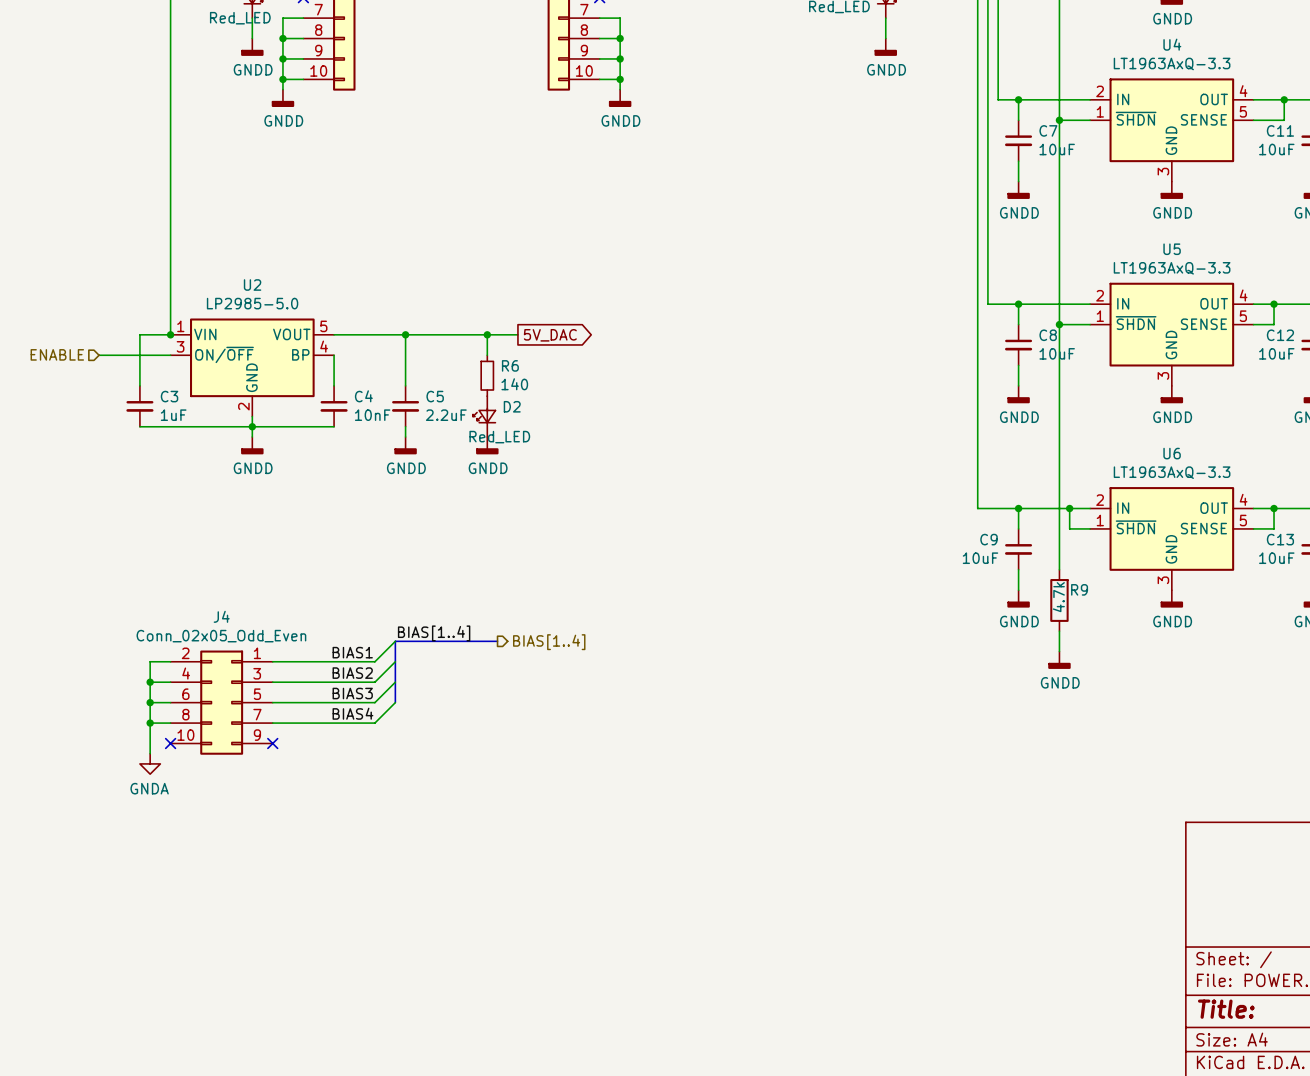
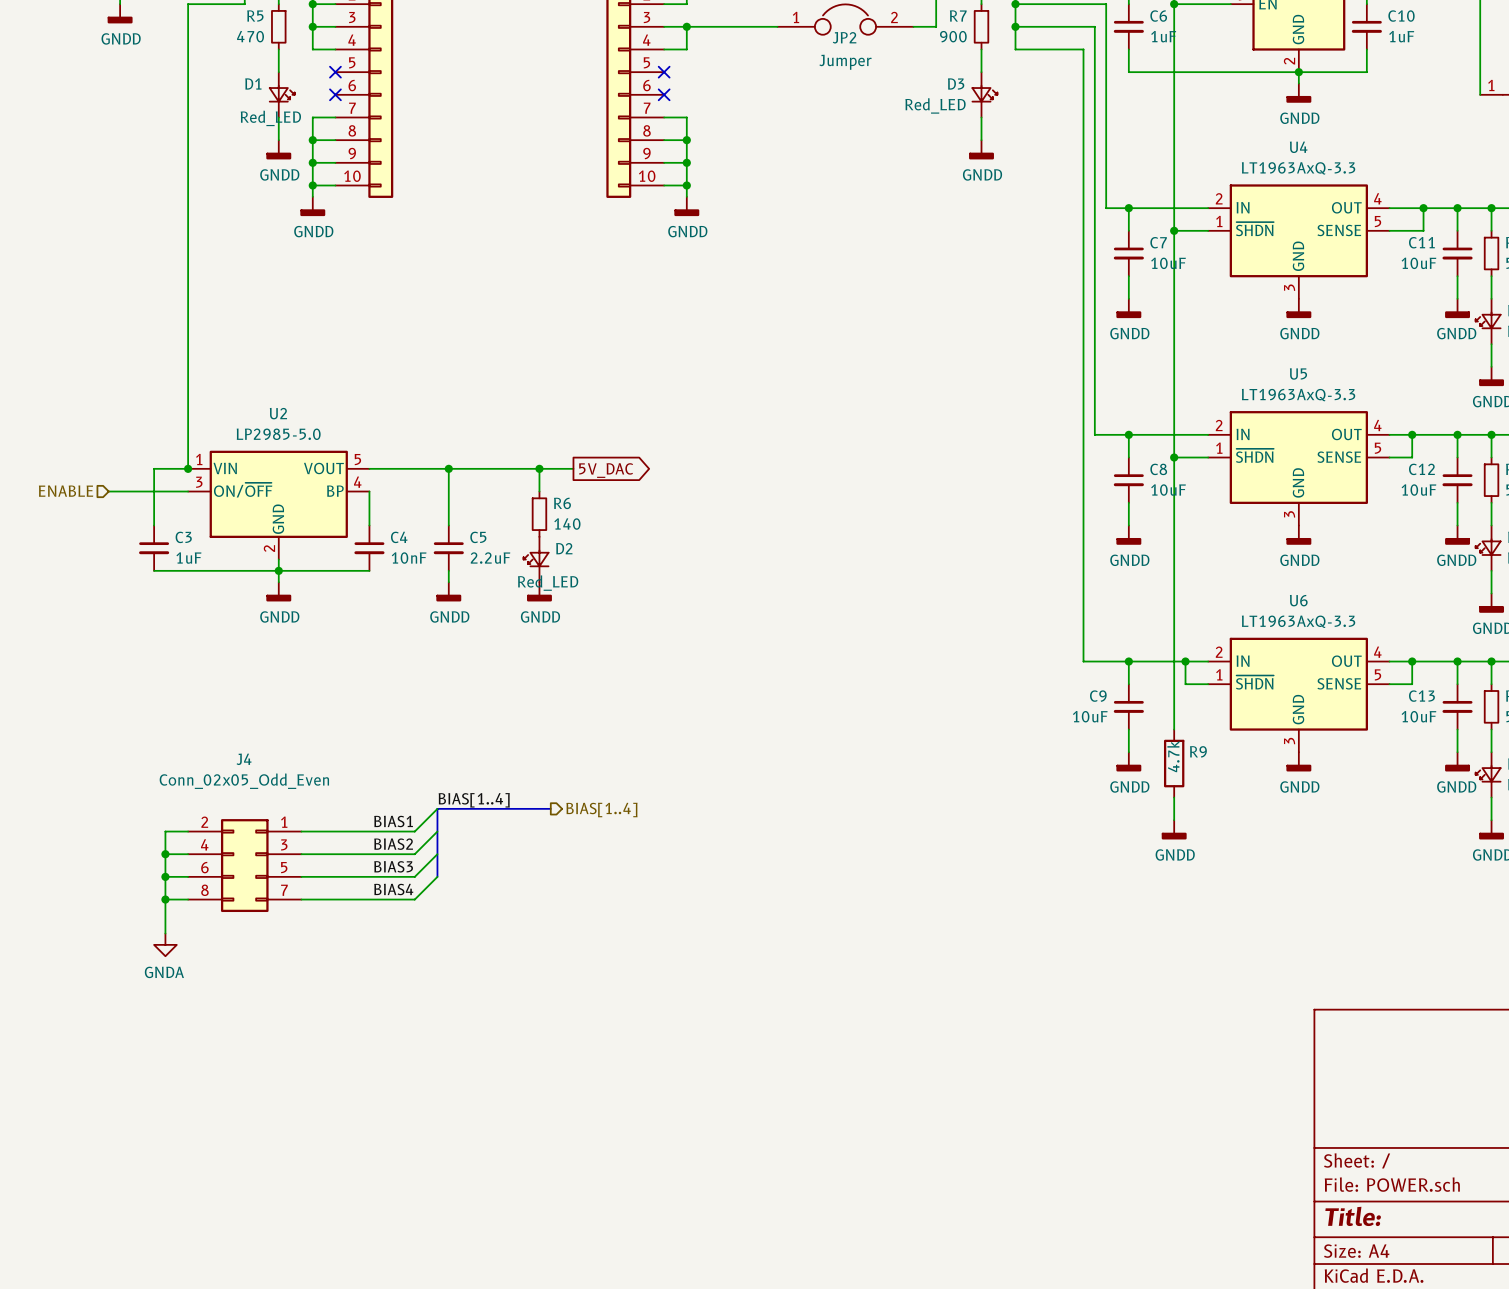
J4 symbol: [170, 650, 273, 755] -> [188, 819, 302, 913]
no-connect mark: (170, 743) -> none
no-connect mark: (272, 743) -> none

